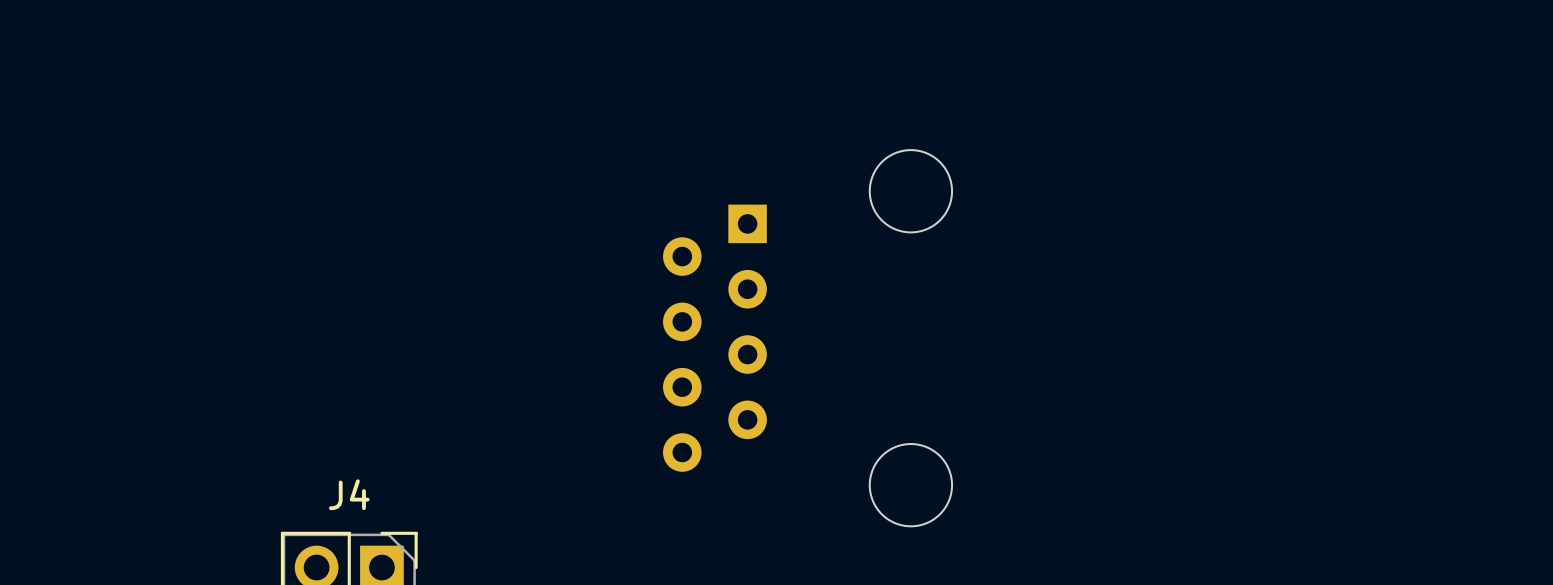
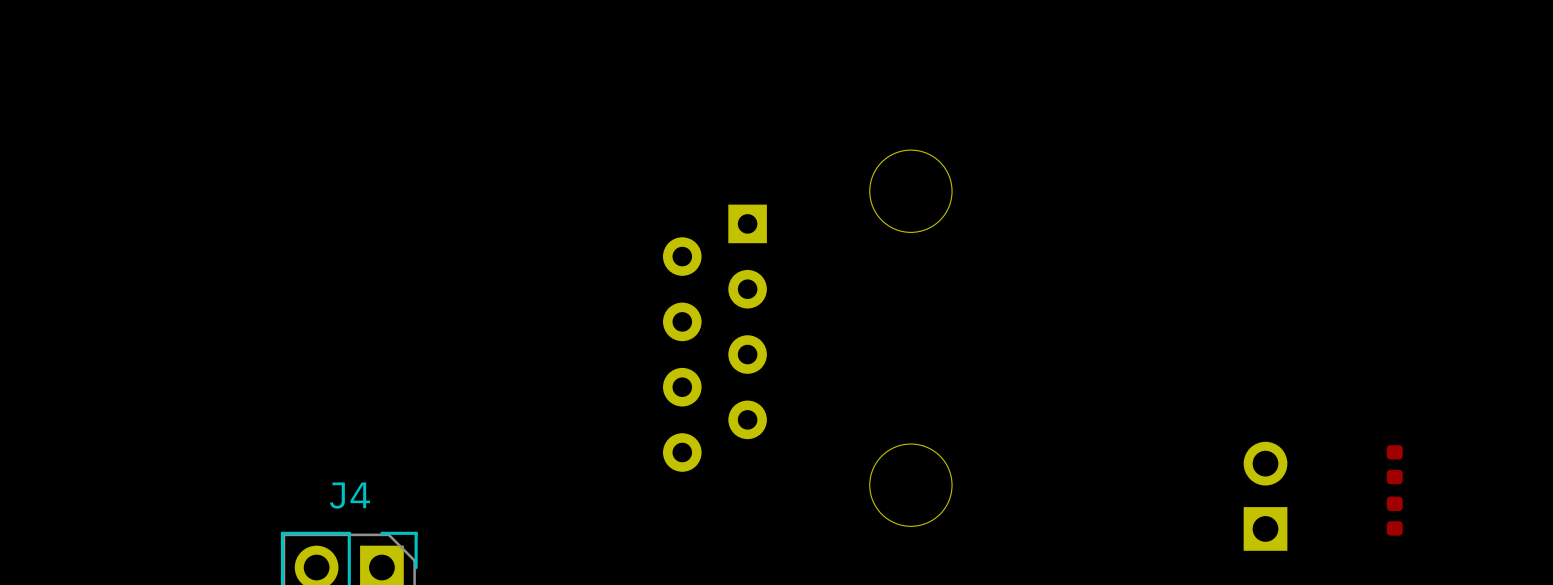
part: none -> (1394, 464)
part: none -> (1265, 496)
part: none -> (1394, 516)

